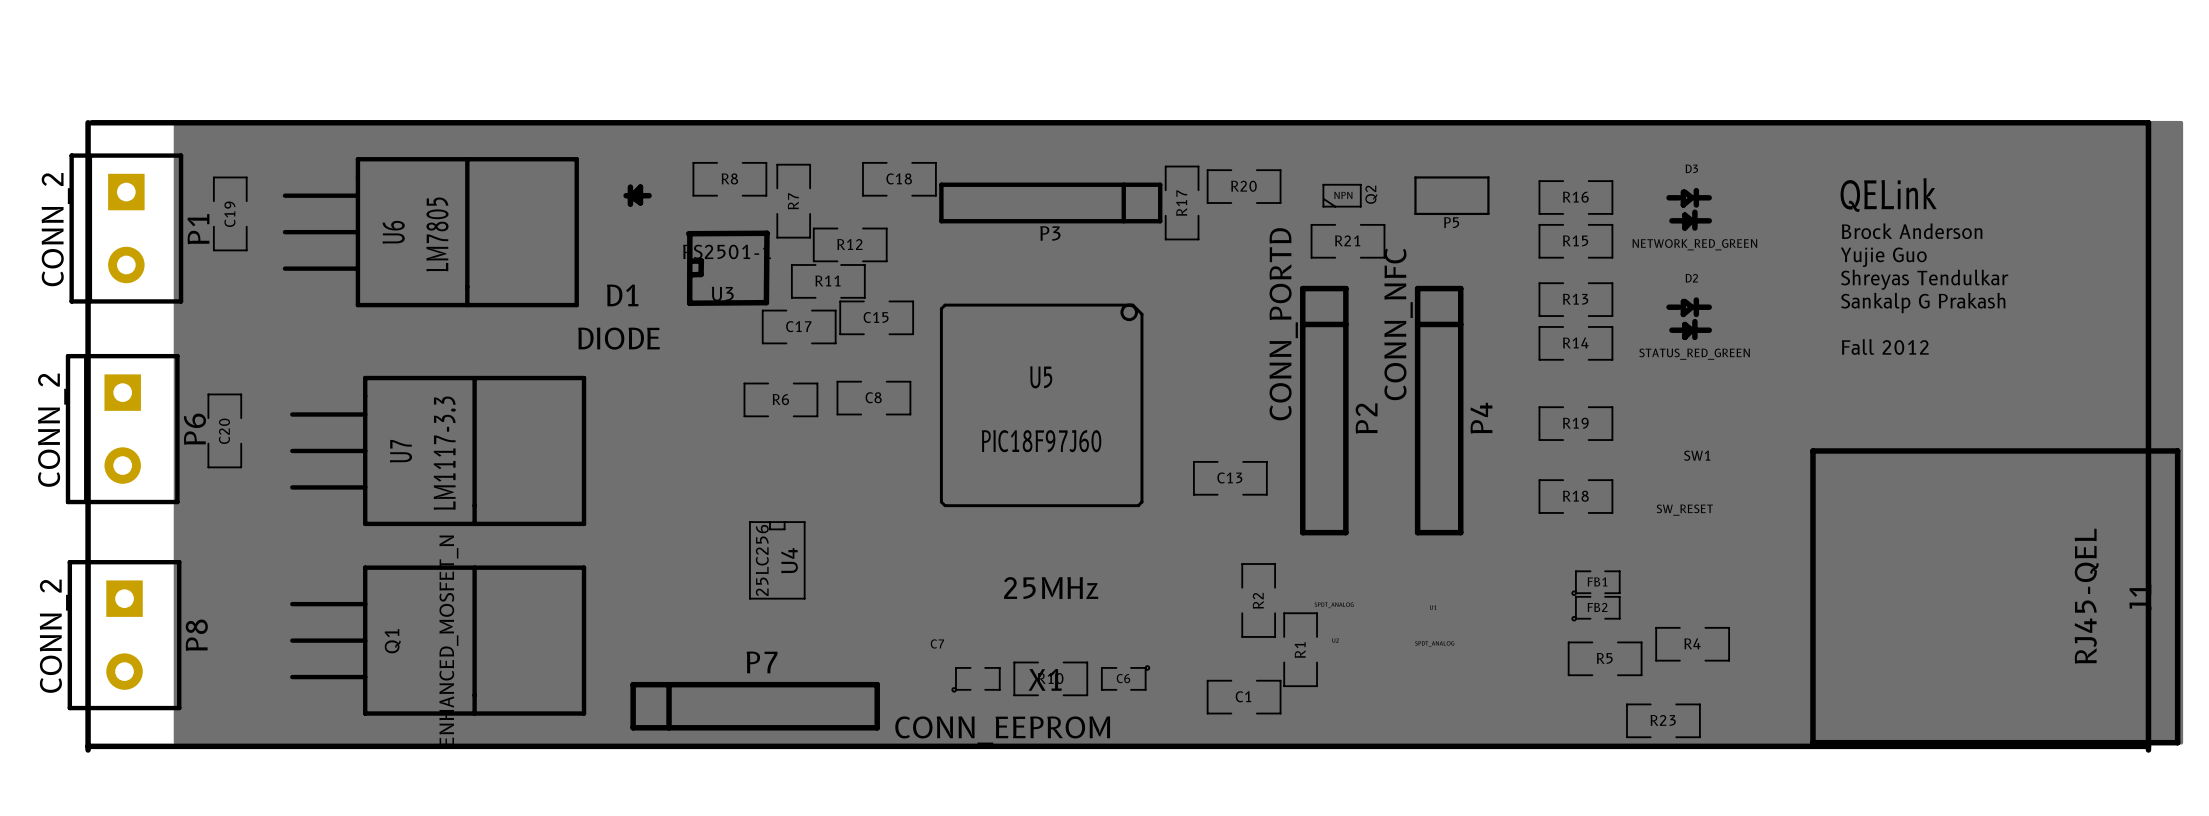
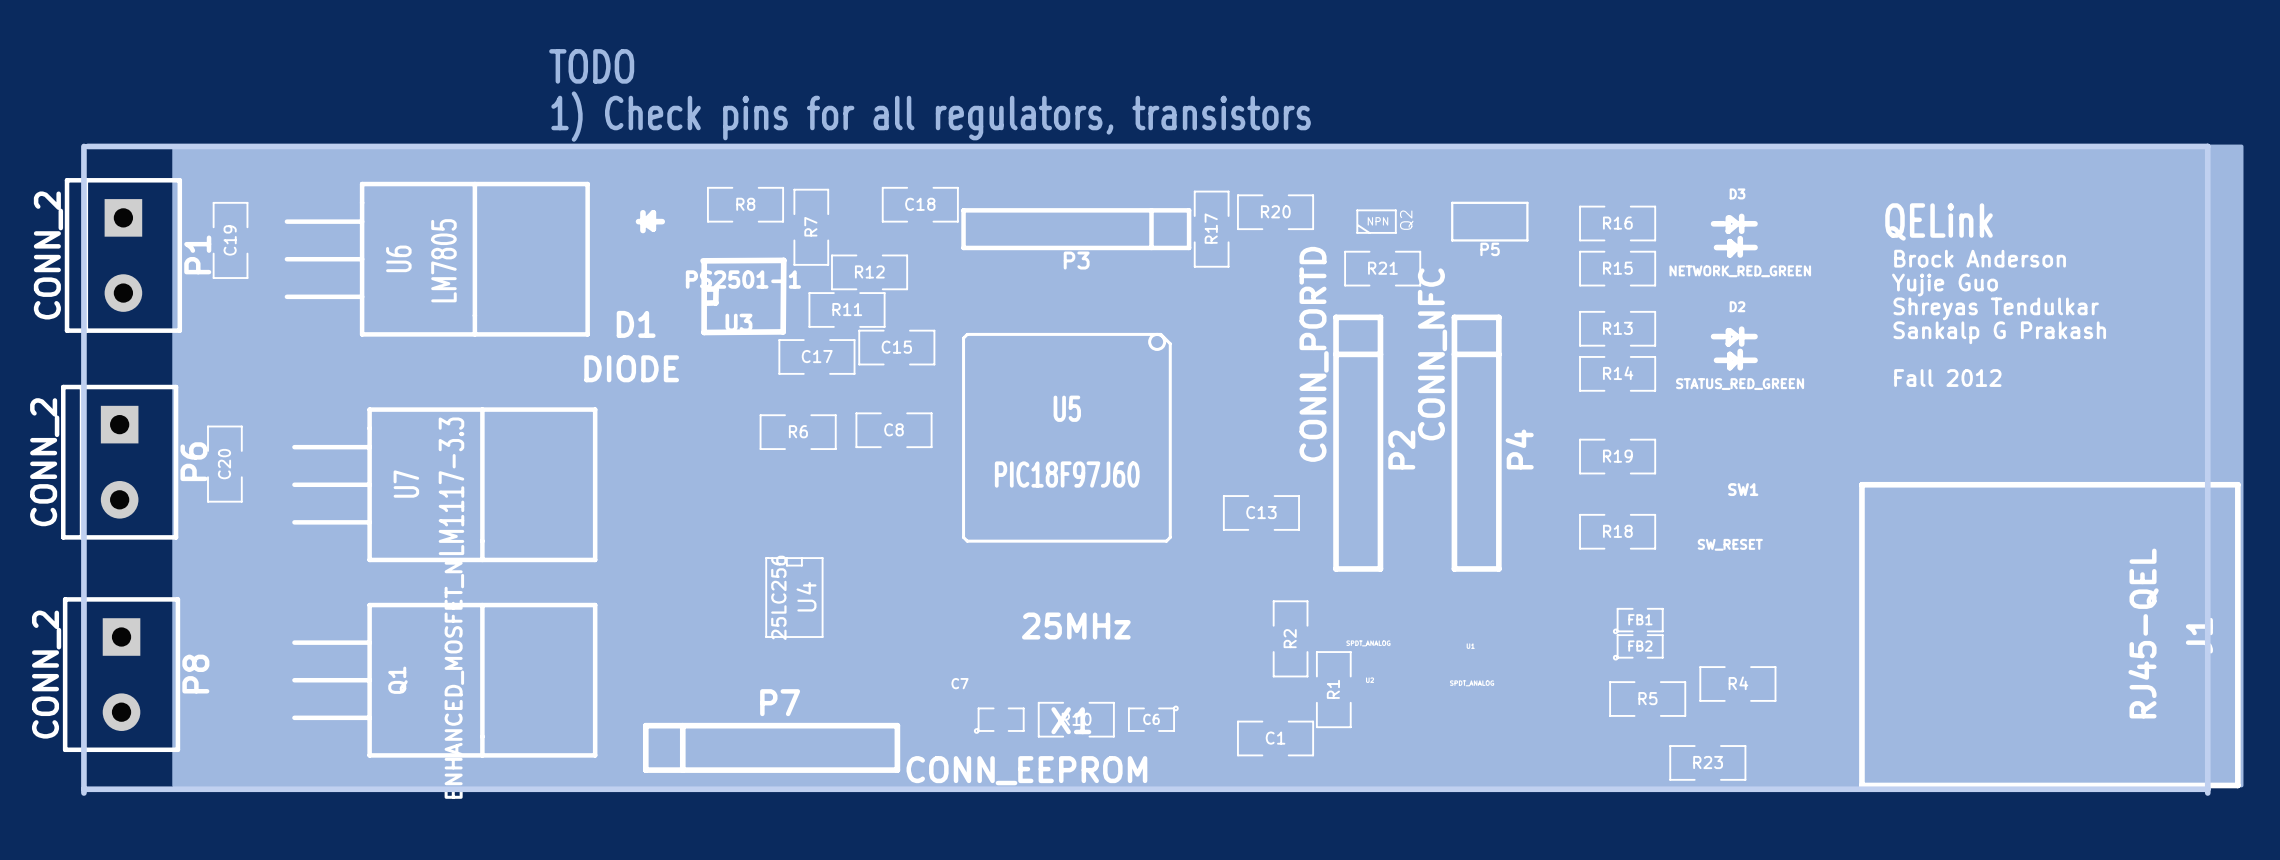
text: none -> TODO (591, 66)
text: none -> 1) Check pins for all regulators, transistors (931, 116)

